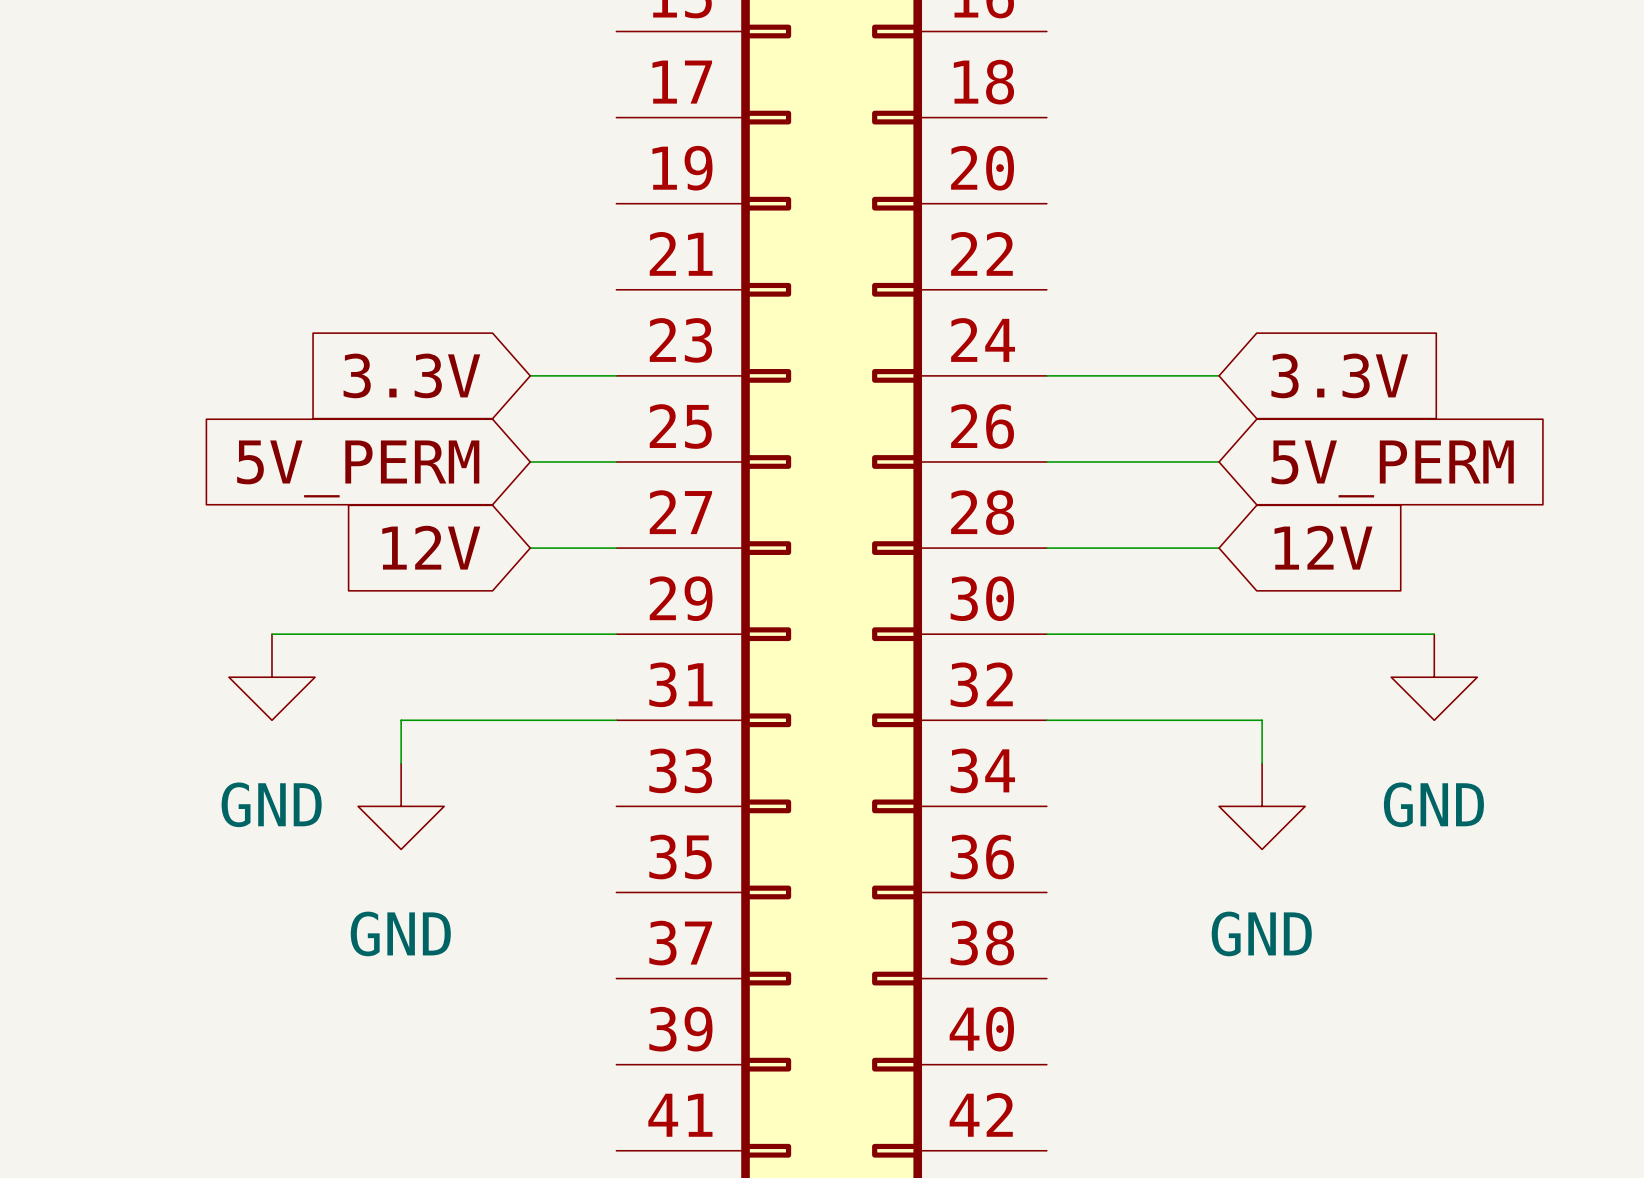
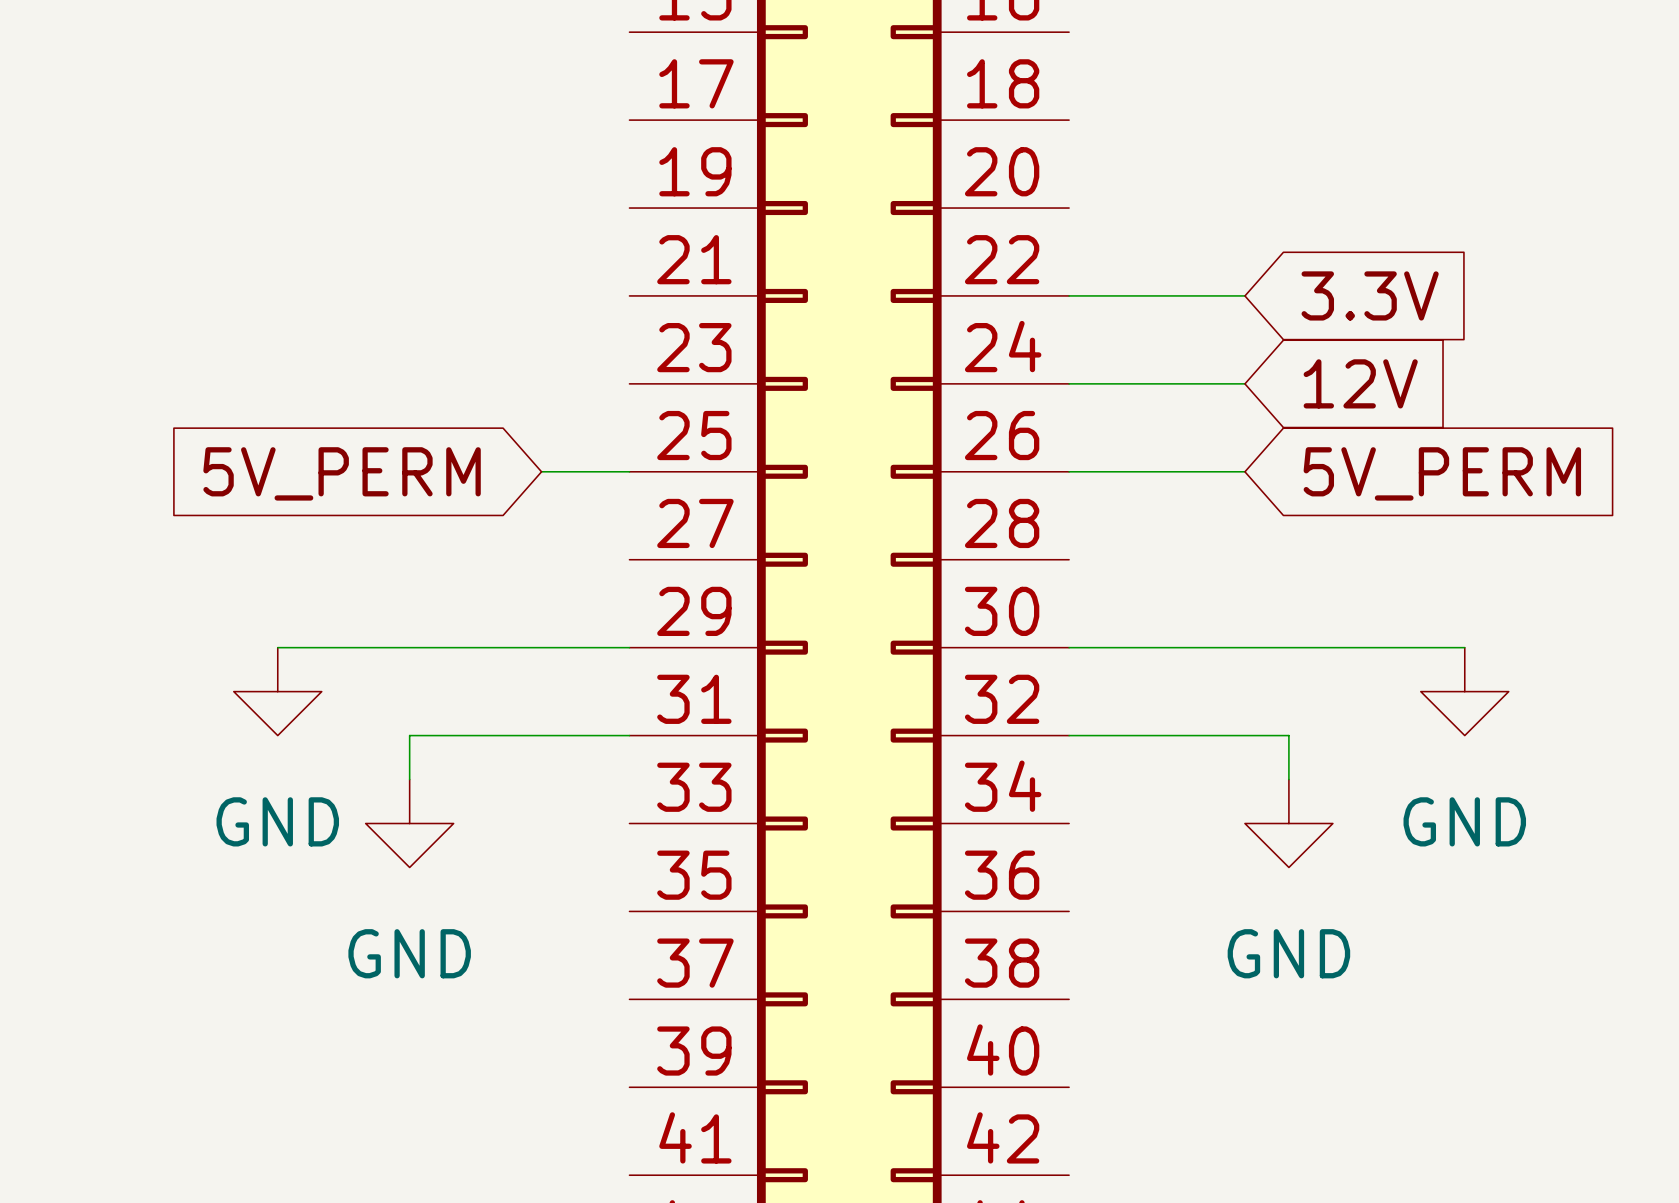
global label rotation: 0° (411, 375) -> 180° (1370, 295)
global label position: 3.3V (411, 375) -> 3.3V (1370, 295)
wire: (530, 375) (616, 375) -> none
global label: 3.3V (1339, 375) -> 12V (1360, 383)
global label: 12V (431, 547) -> none
global label: 12V (1323, 547) -> none
wire: (530, 548) (616, 548) -> none
wire: (1046, 548) (1219, 548) -> (1069, 295) (1244, 295)

